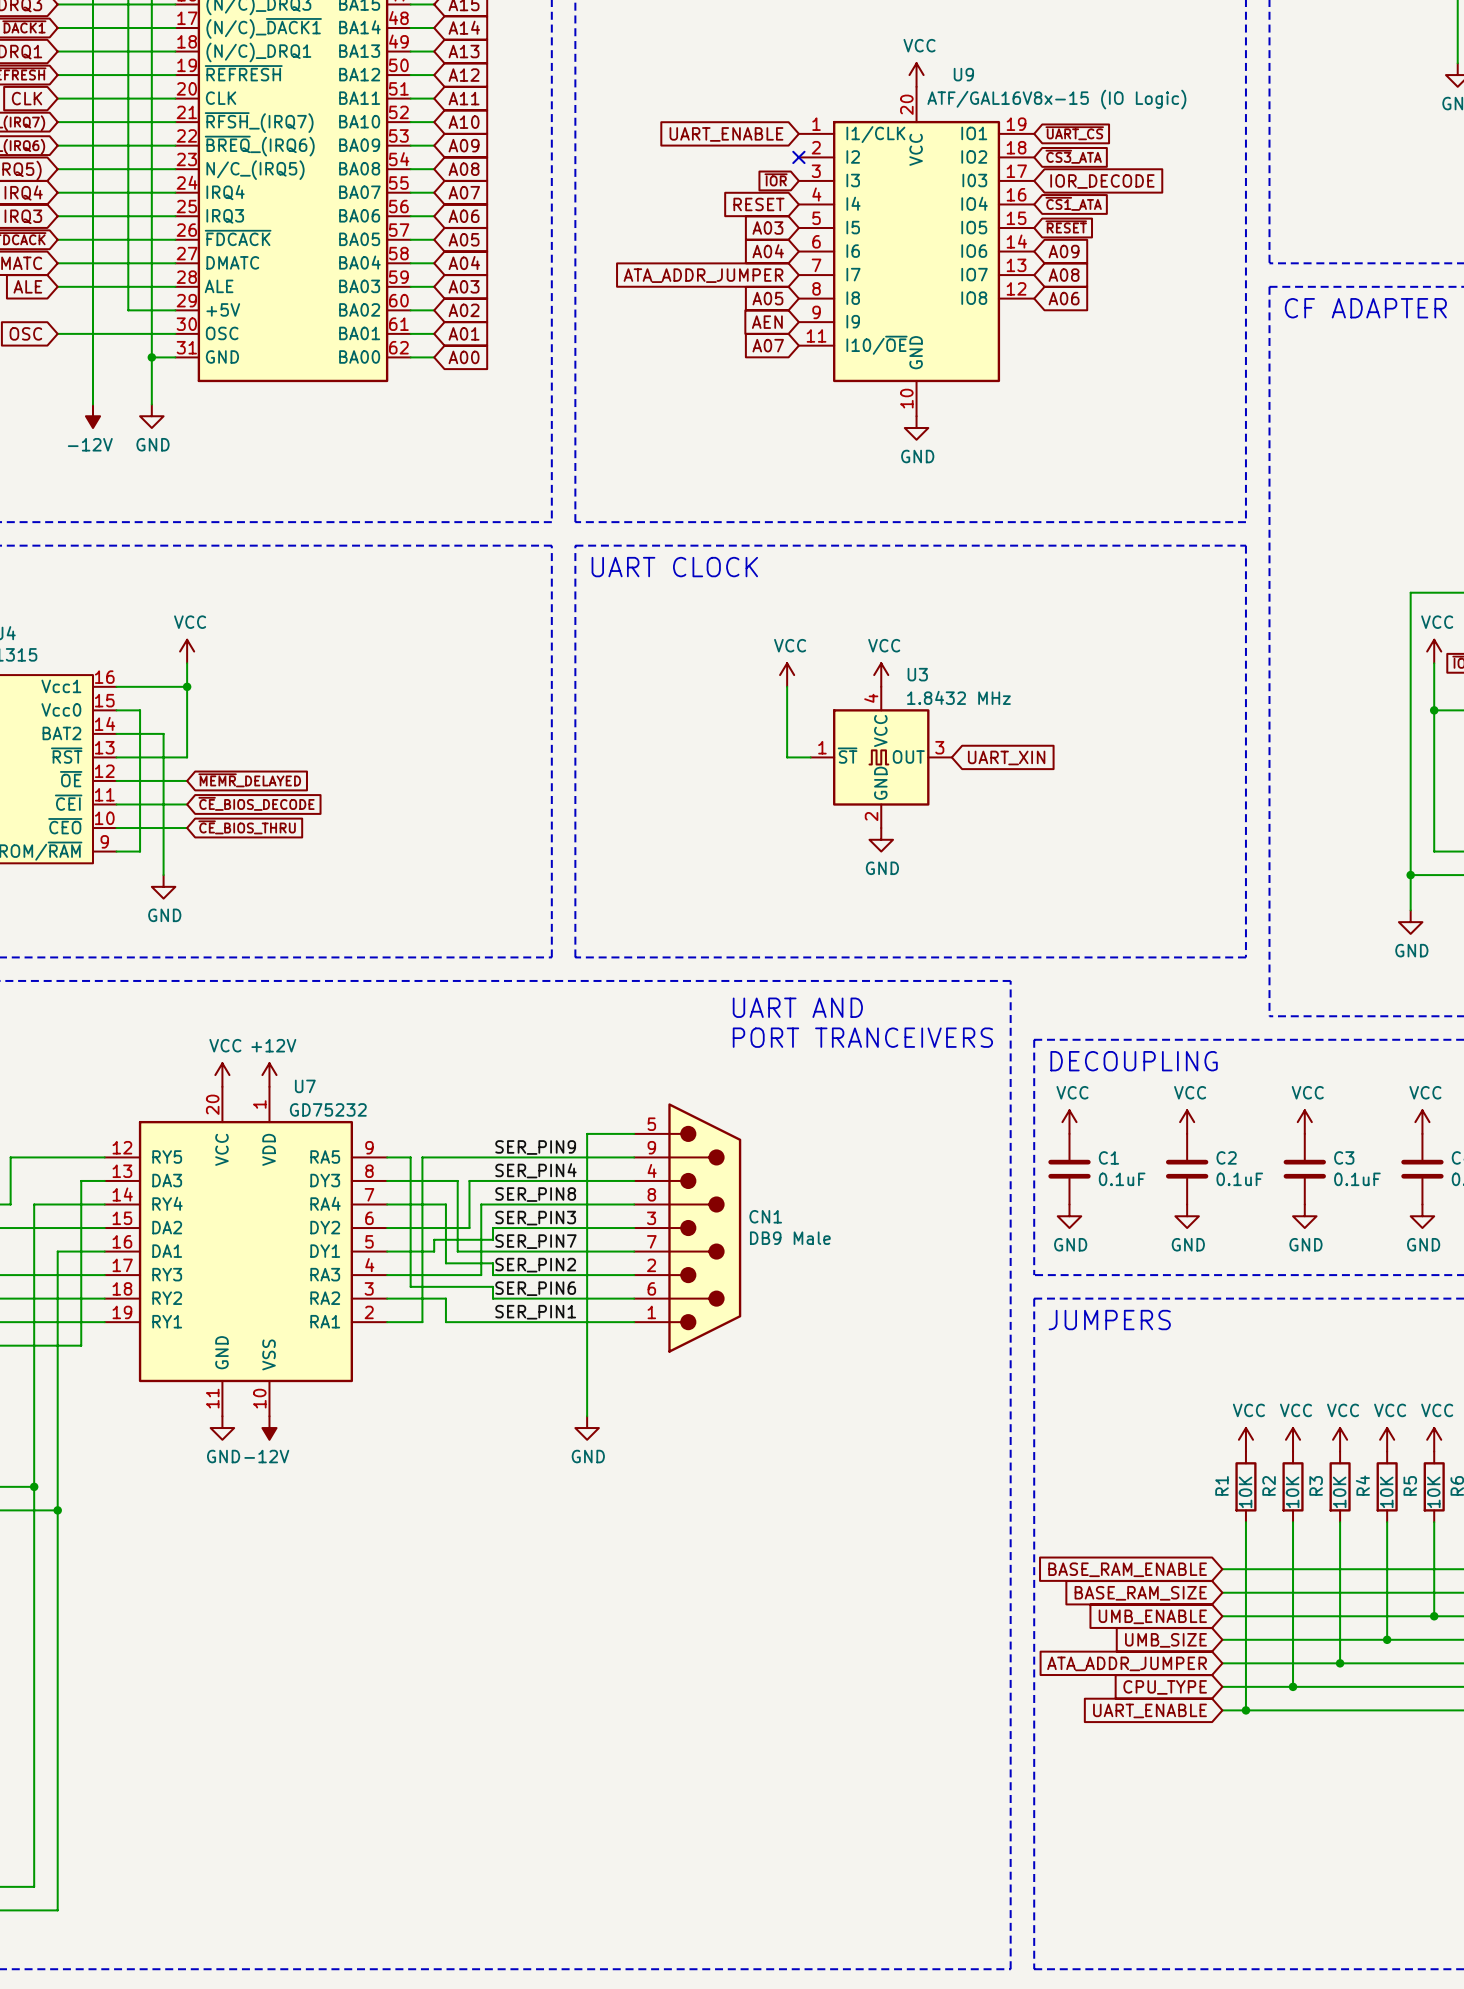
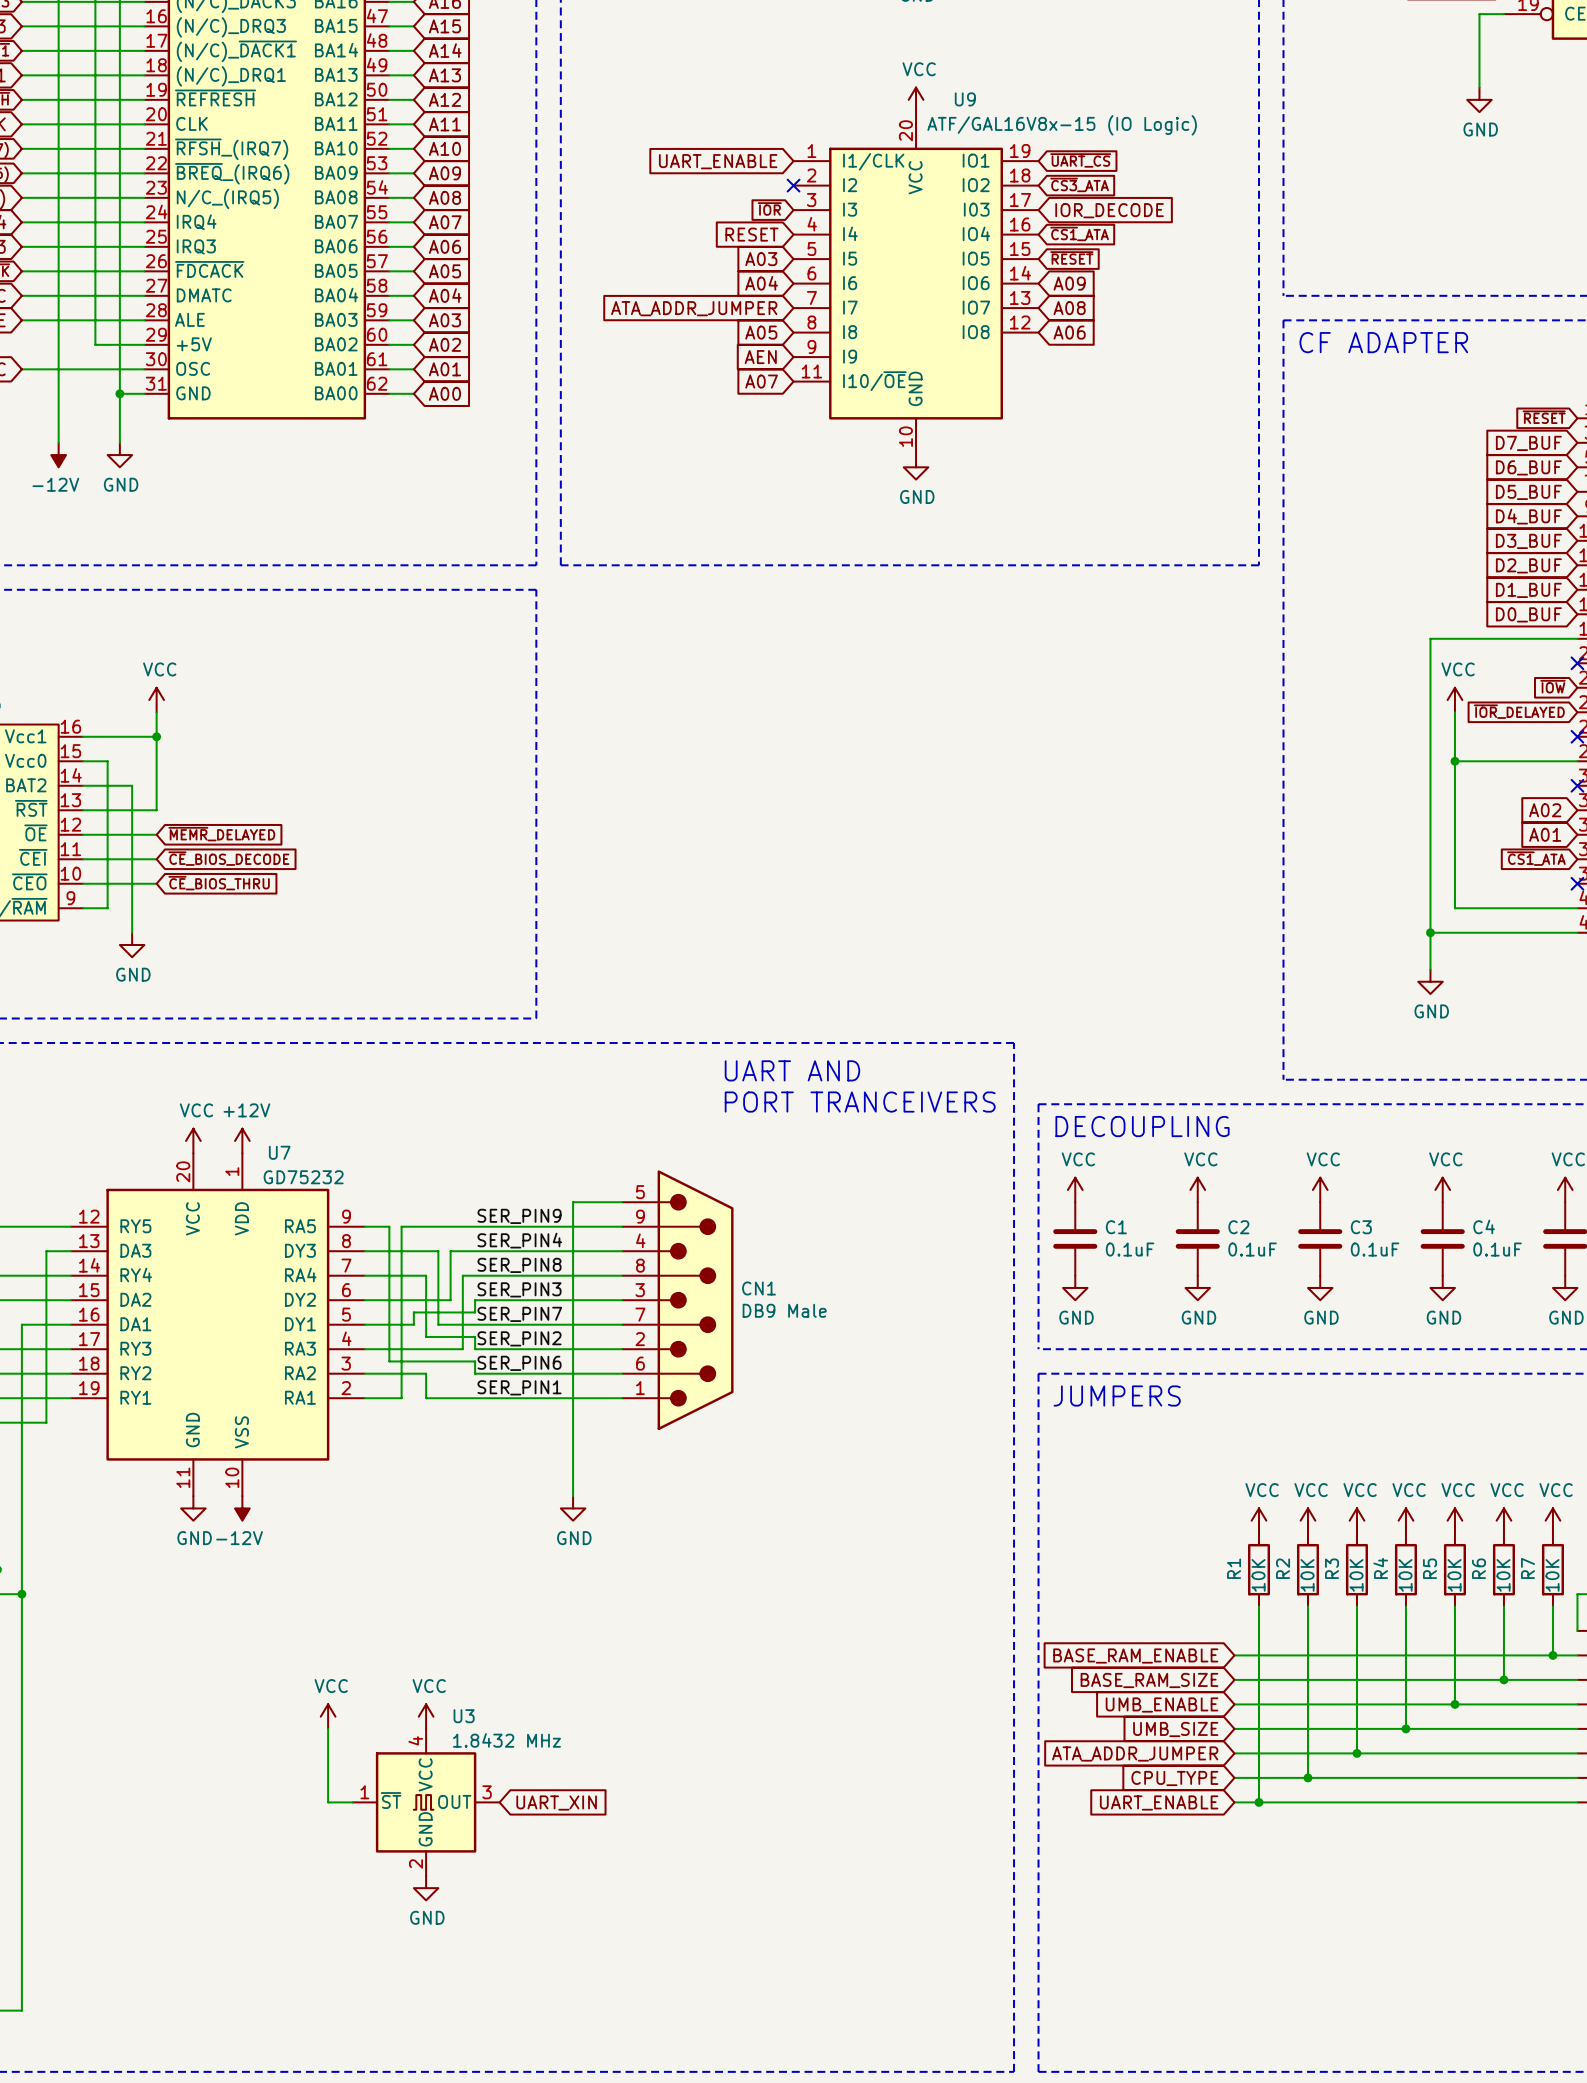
line: (575, 545) (1245, 545) (1245, 957) (575, 957) (575, 545) -> none
text: UART CLOCK (674, 567) -> none
power symbol: VCC (787, 675) -> none
power symbol: VCC (881, 675) -> none
wire: (787, 686) (787, 757) (810, 757) -> none
U3 position: (881, 757) -> (426, 1802)
global label: UART_XIN (1006, 757) -> none
power symbol: GND (881, 839) -> none
power symbol: none -> VCC (328, 1716)
power symbol: none -> VCC (426, 1716)
wire: none -> (328, 1728) (328, 1802) (352, 1802)
global label: none -> UART_XIN (556, 1802)
power symbol: none -> GND (426, 1888)

